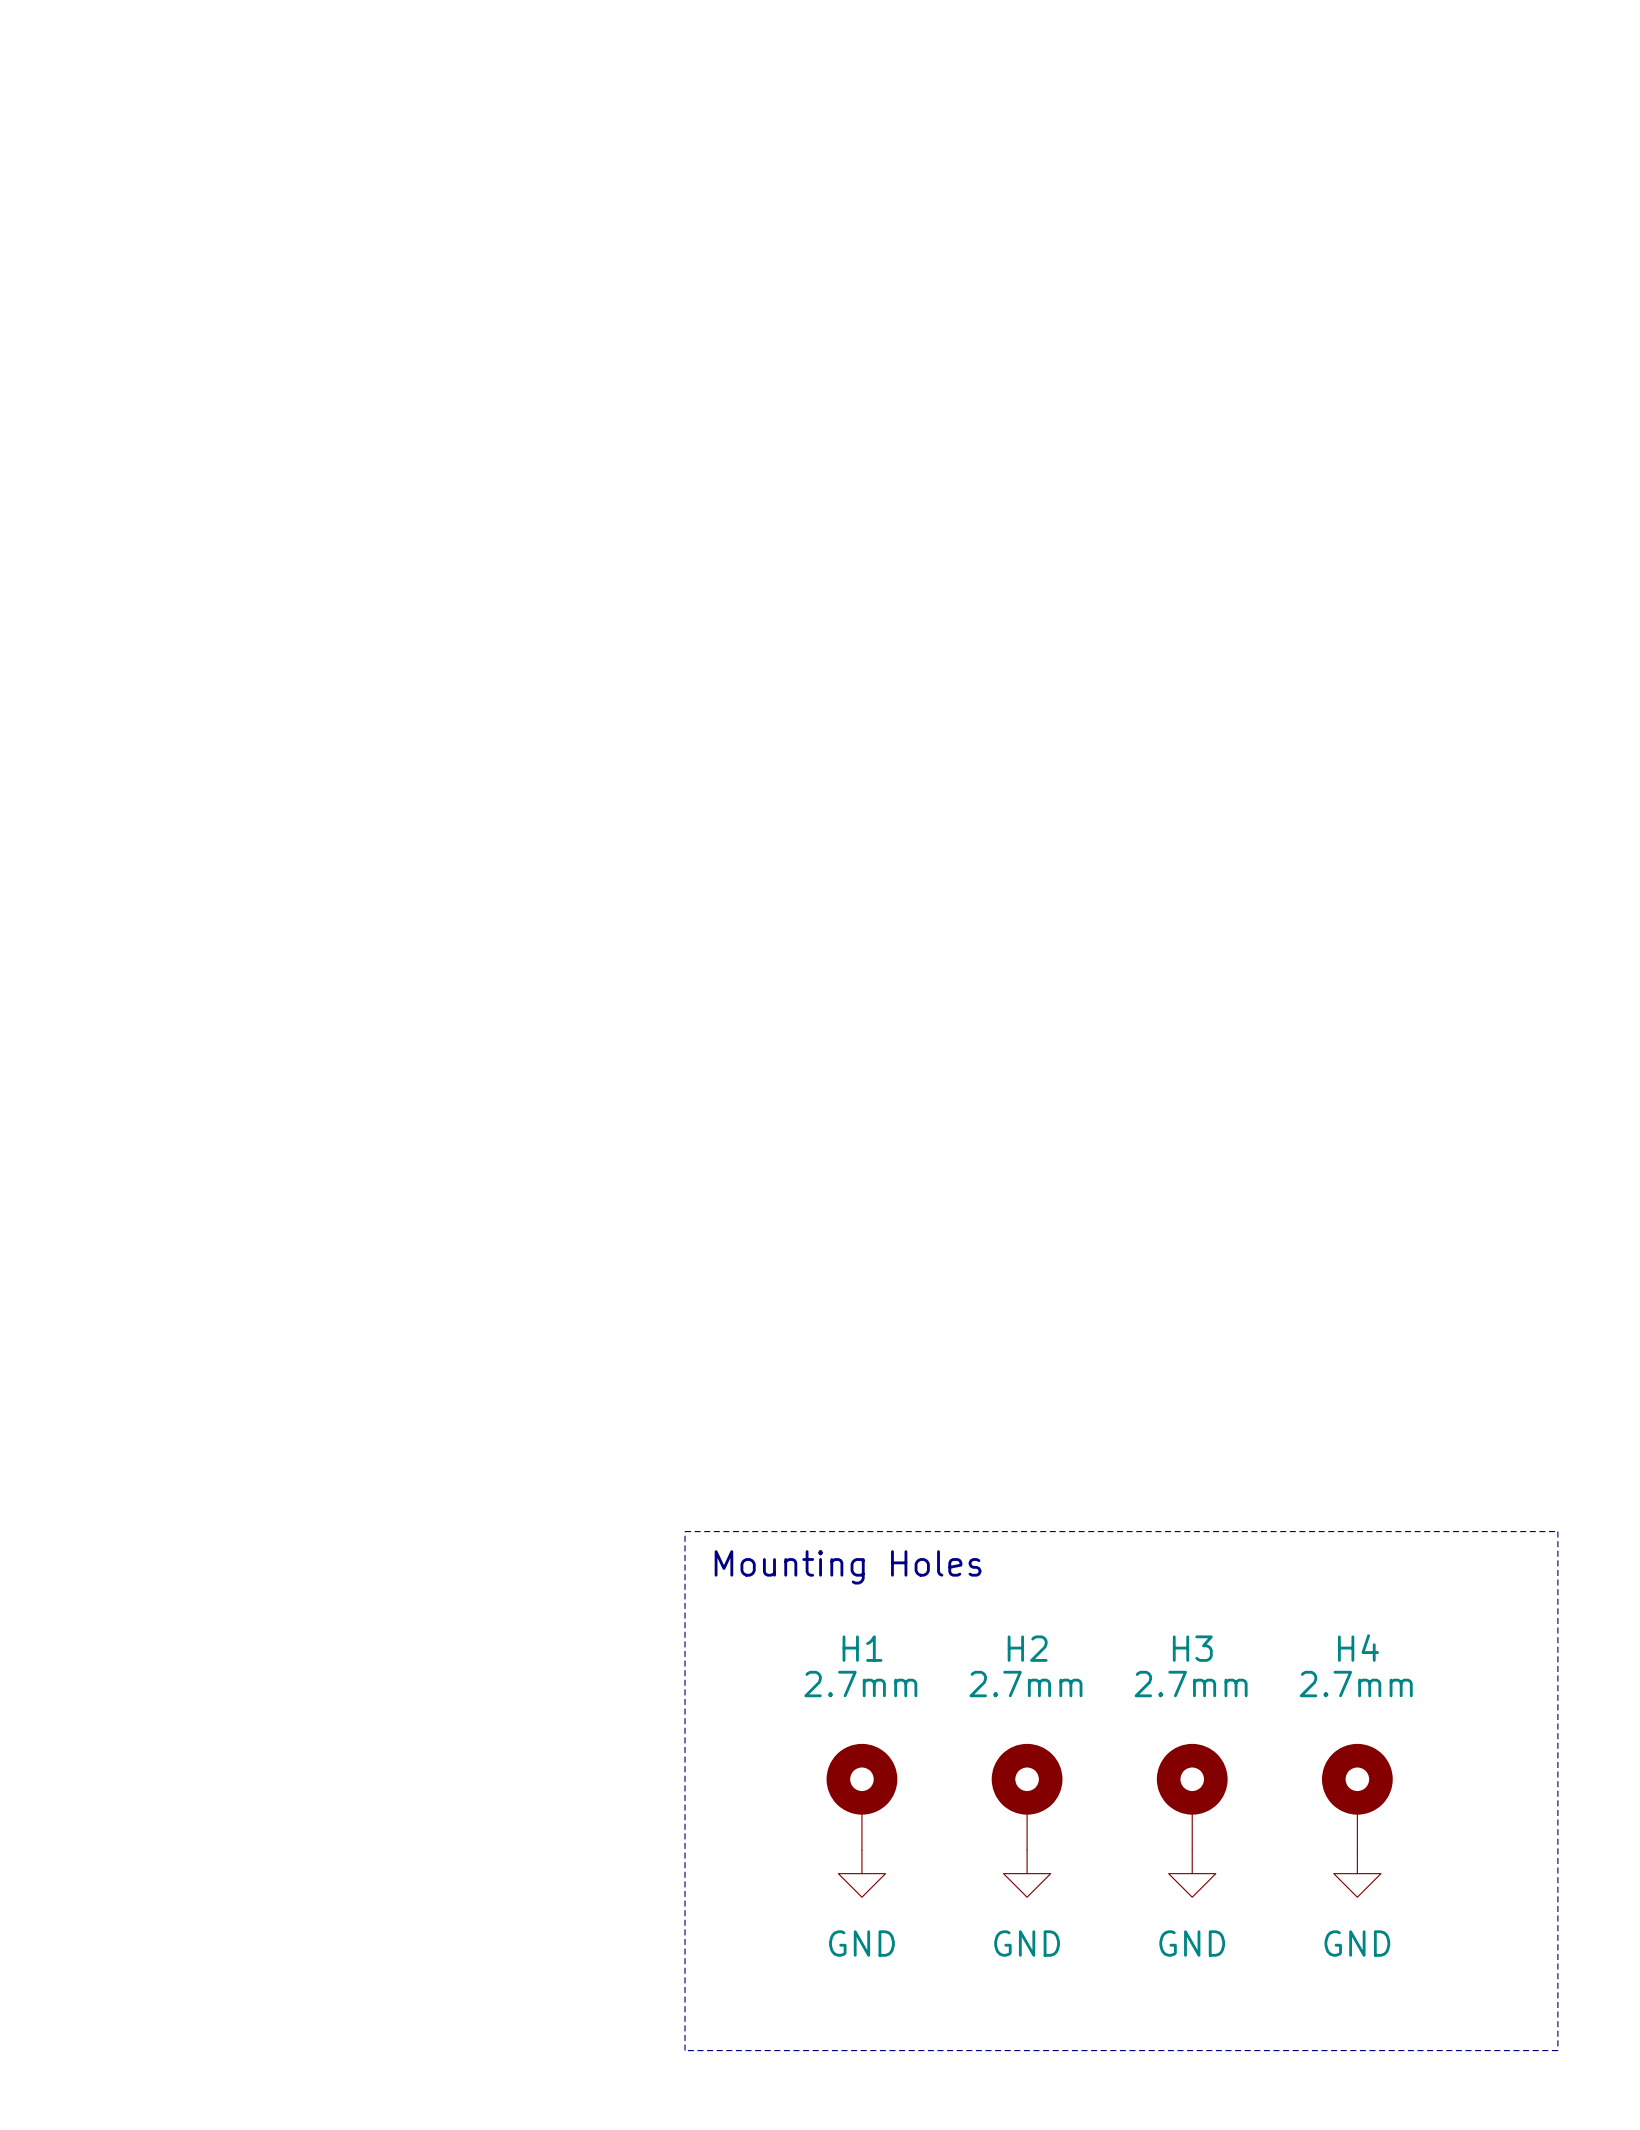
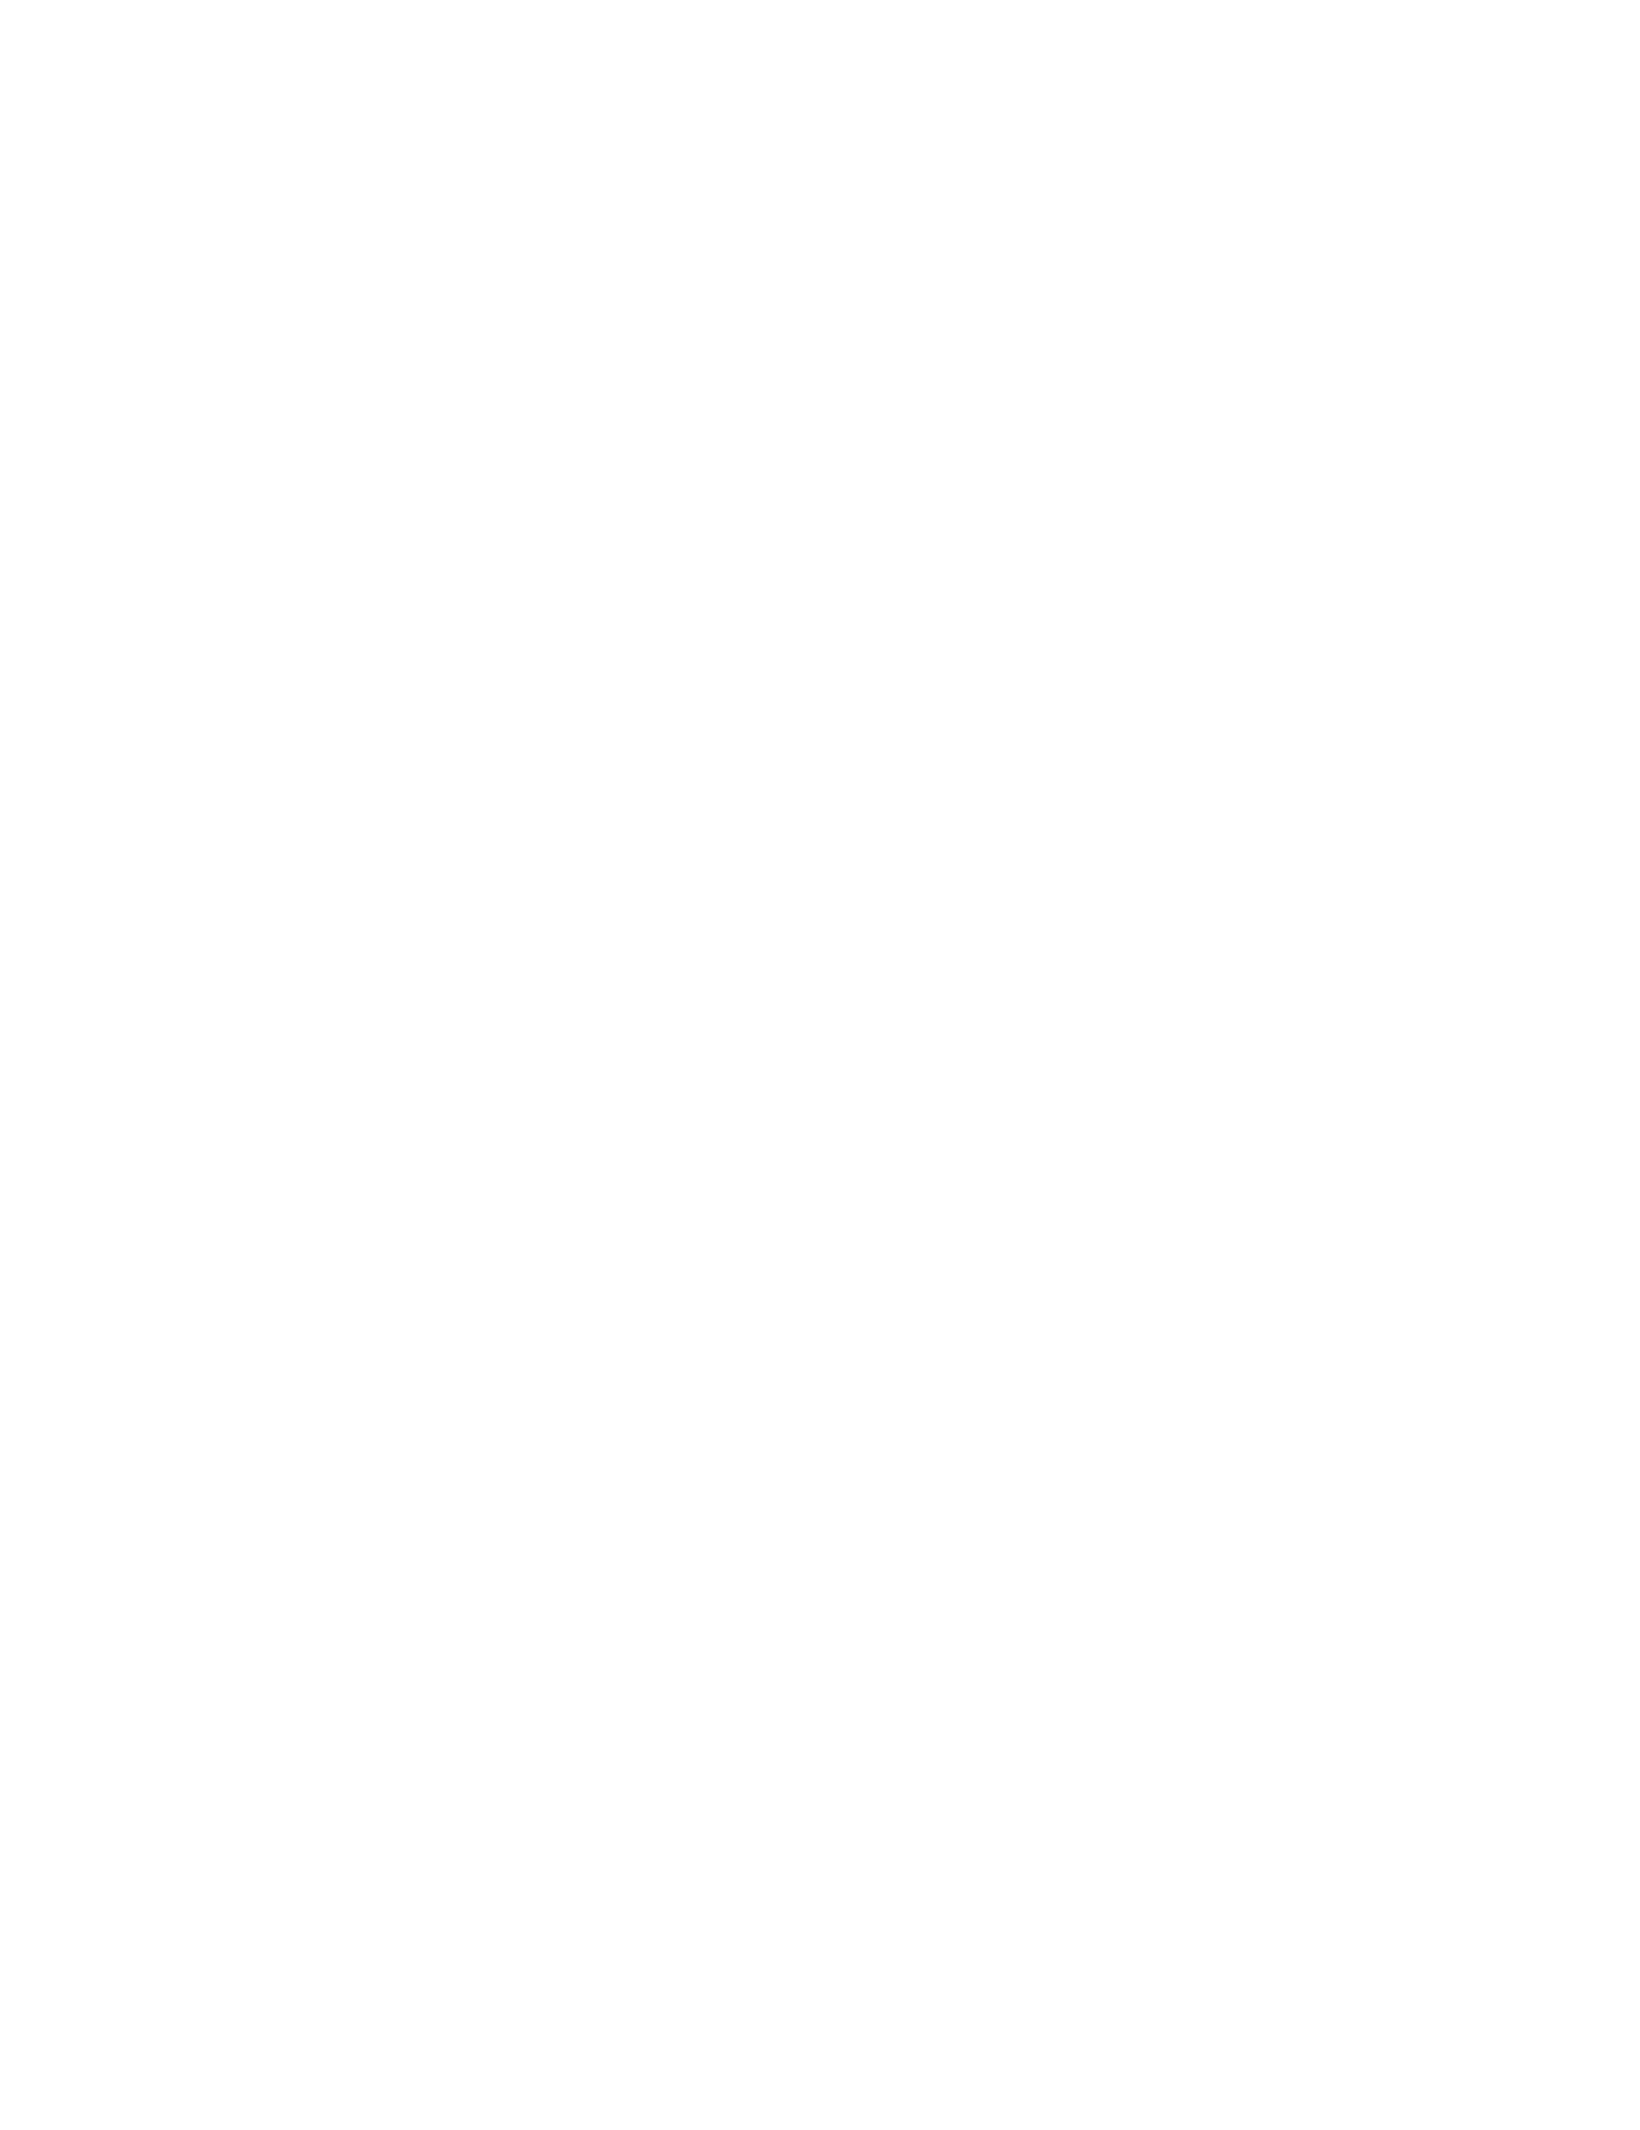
line: (685, 1531) (1557, 1531) (1557, 2050) (685, 2050) (685, 1531) -> none
text: Mounting Holes (848, 1567) -> none
H1: 2.7mm (861, 1796) -> none
H2: 2.7mm (1027, 1796) -> none
H3: 2.7mm (1192, 1796) -> none
H4: 2.7mm (1357, 1796) -> none
power symbol: GND (861, 1873) -> none
power symbol: GND (1027, 1873) -> none
power symbol: GND (1192, 1873) -> none
power symbol: GND (1357, 1873) -> none

